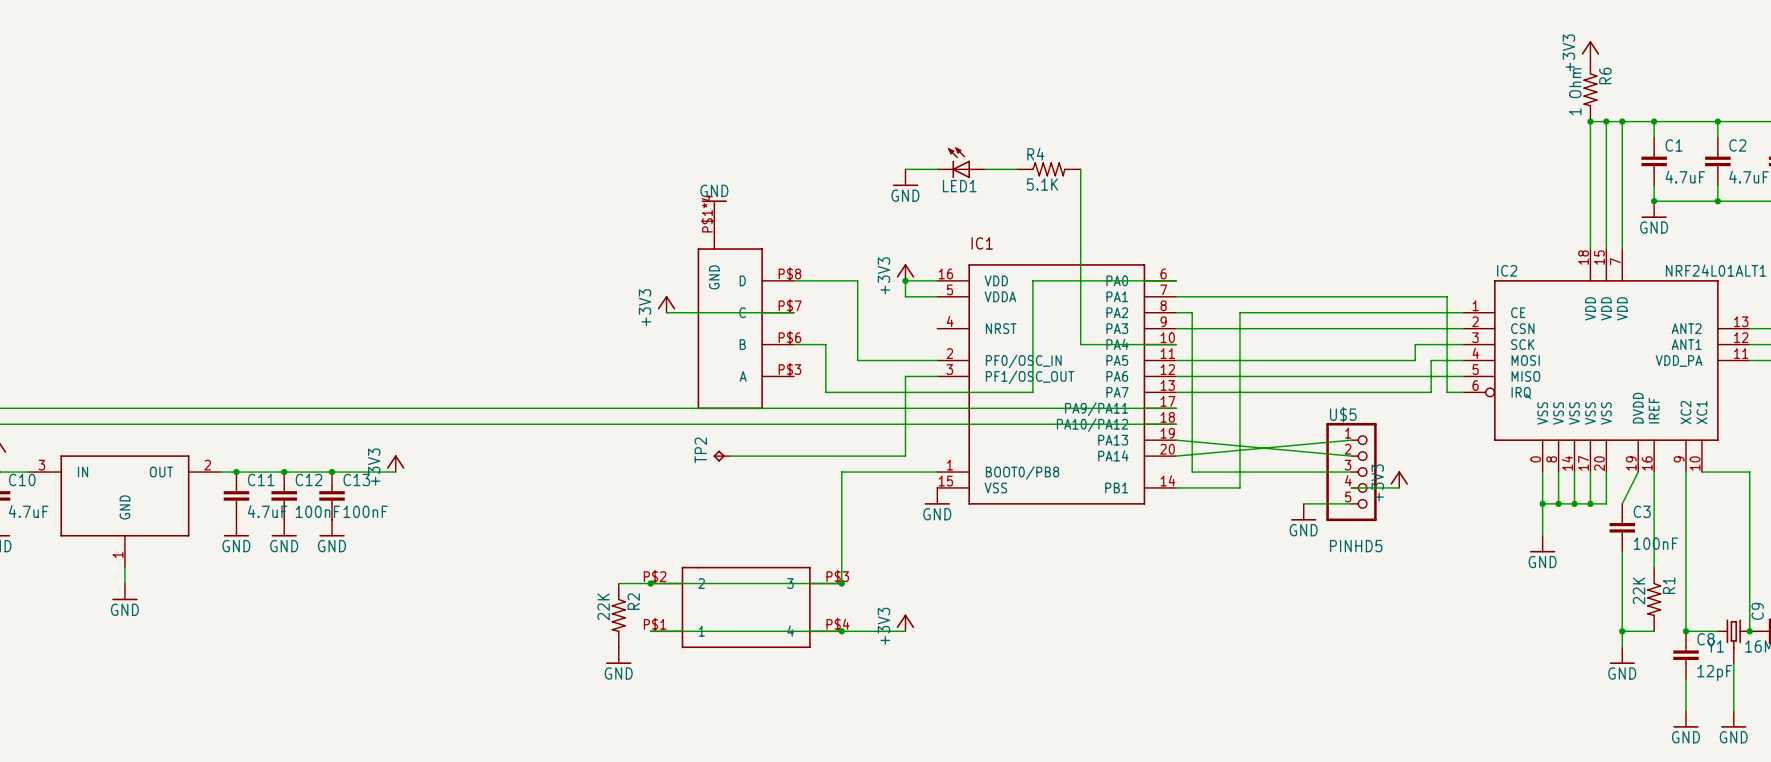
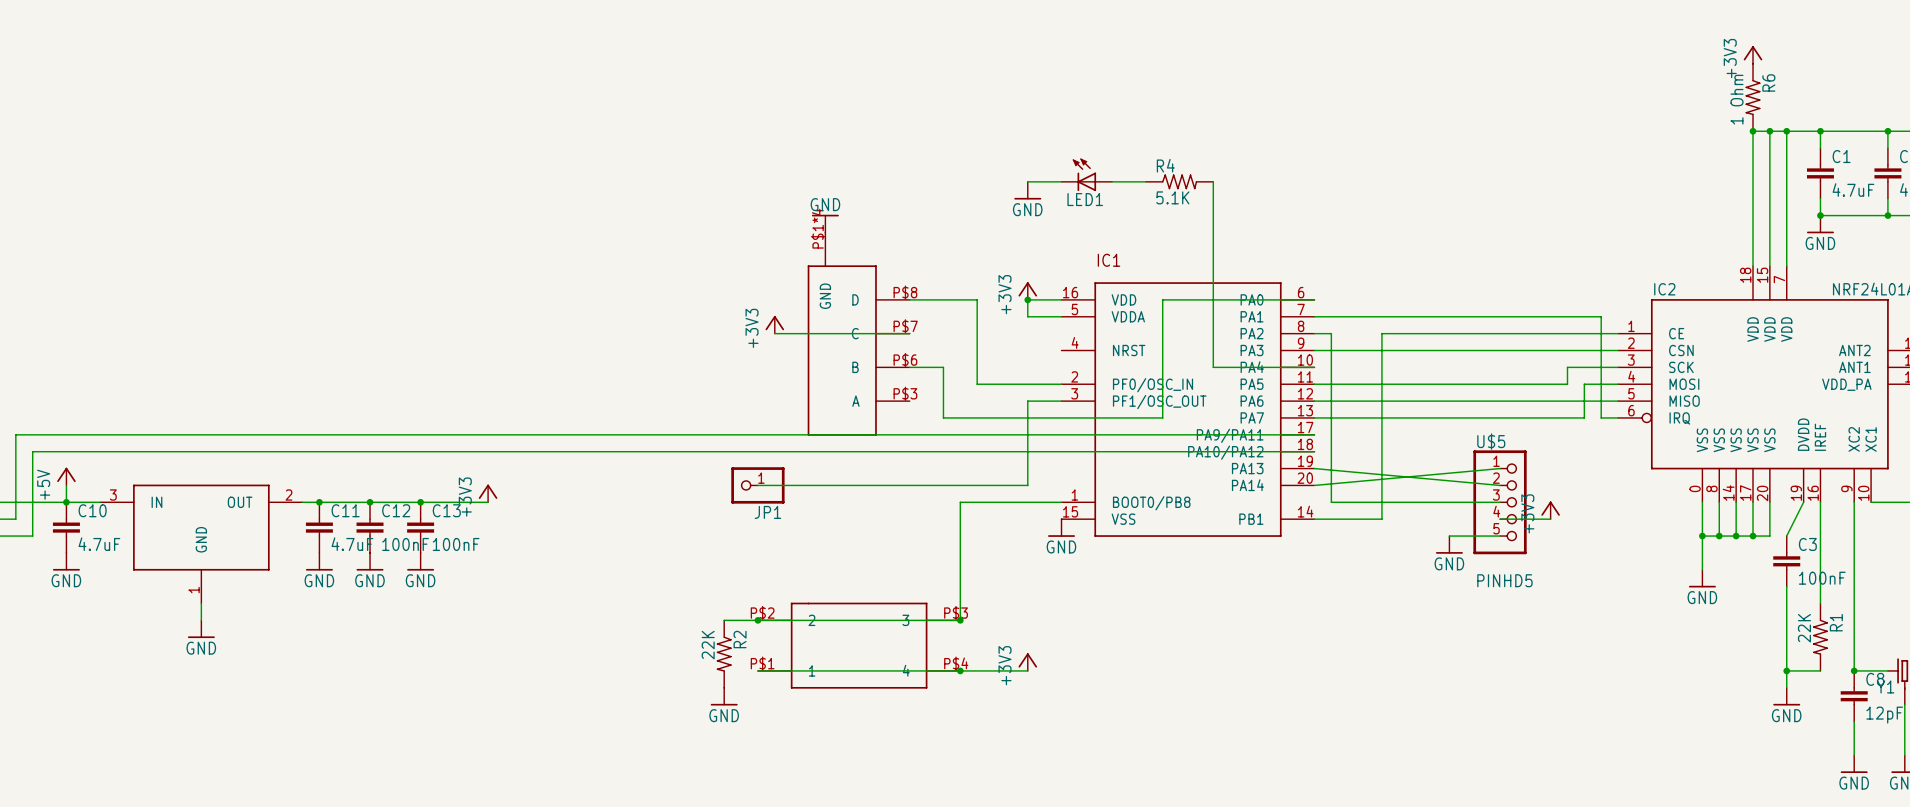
wire: none -> (757, 485) (842, 485)
JP1: none -> (757, 485)
TP2: (721, 456) -> none

